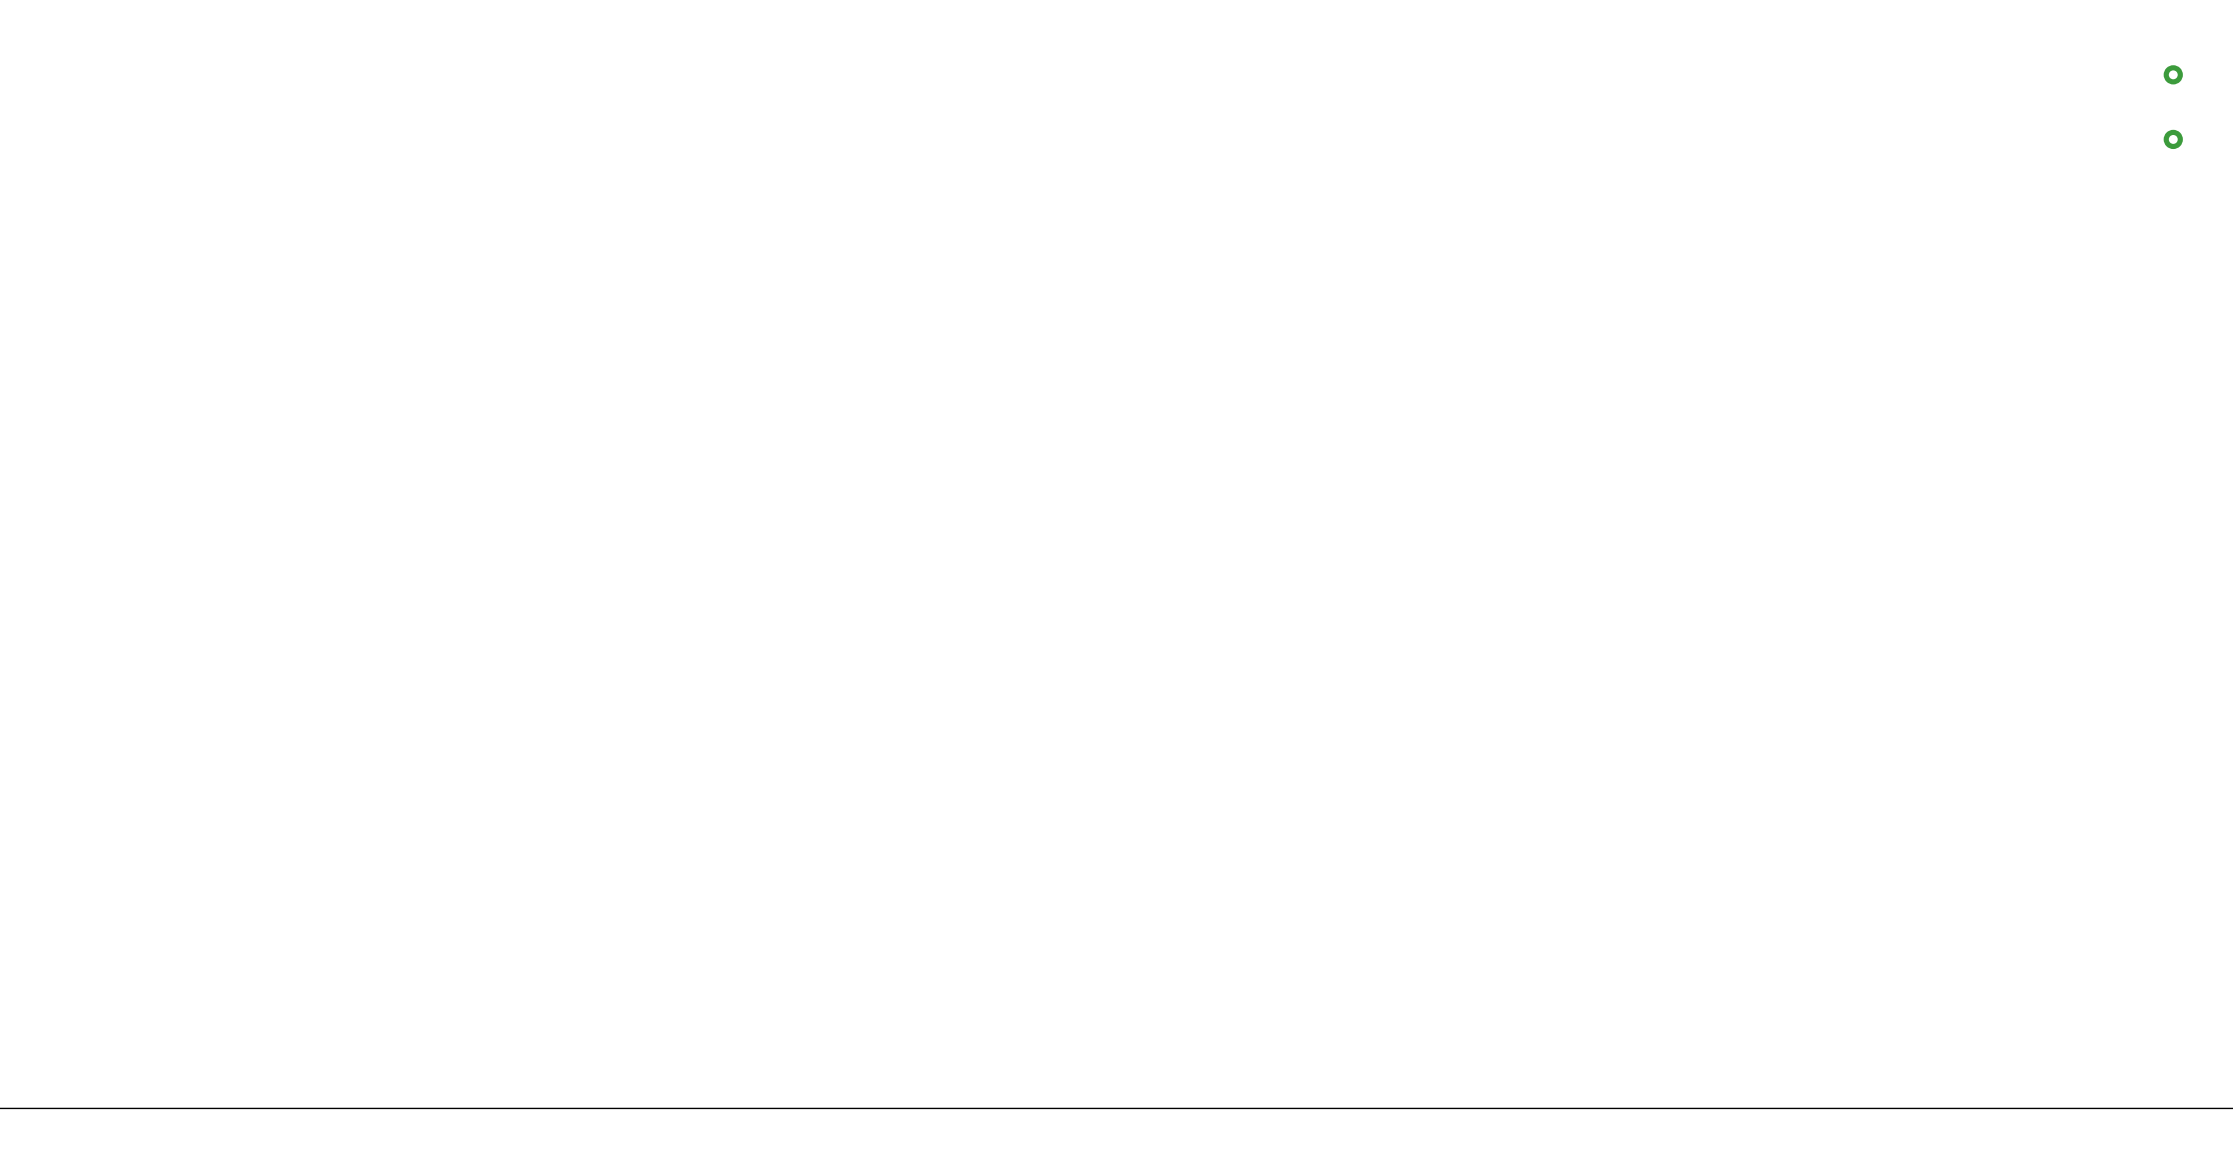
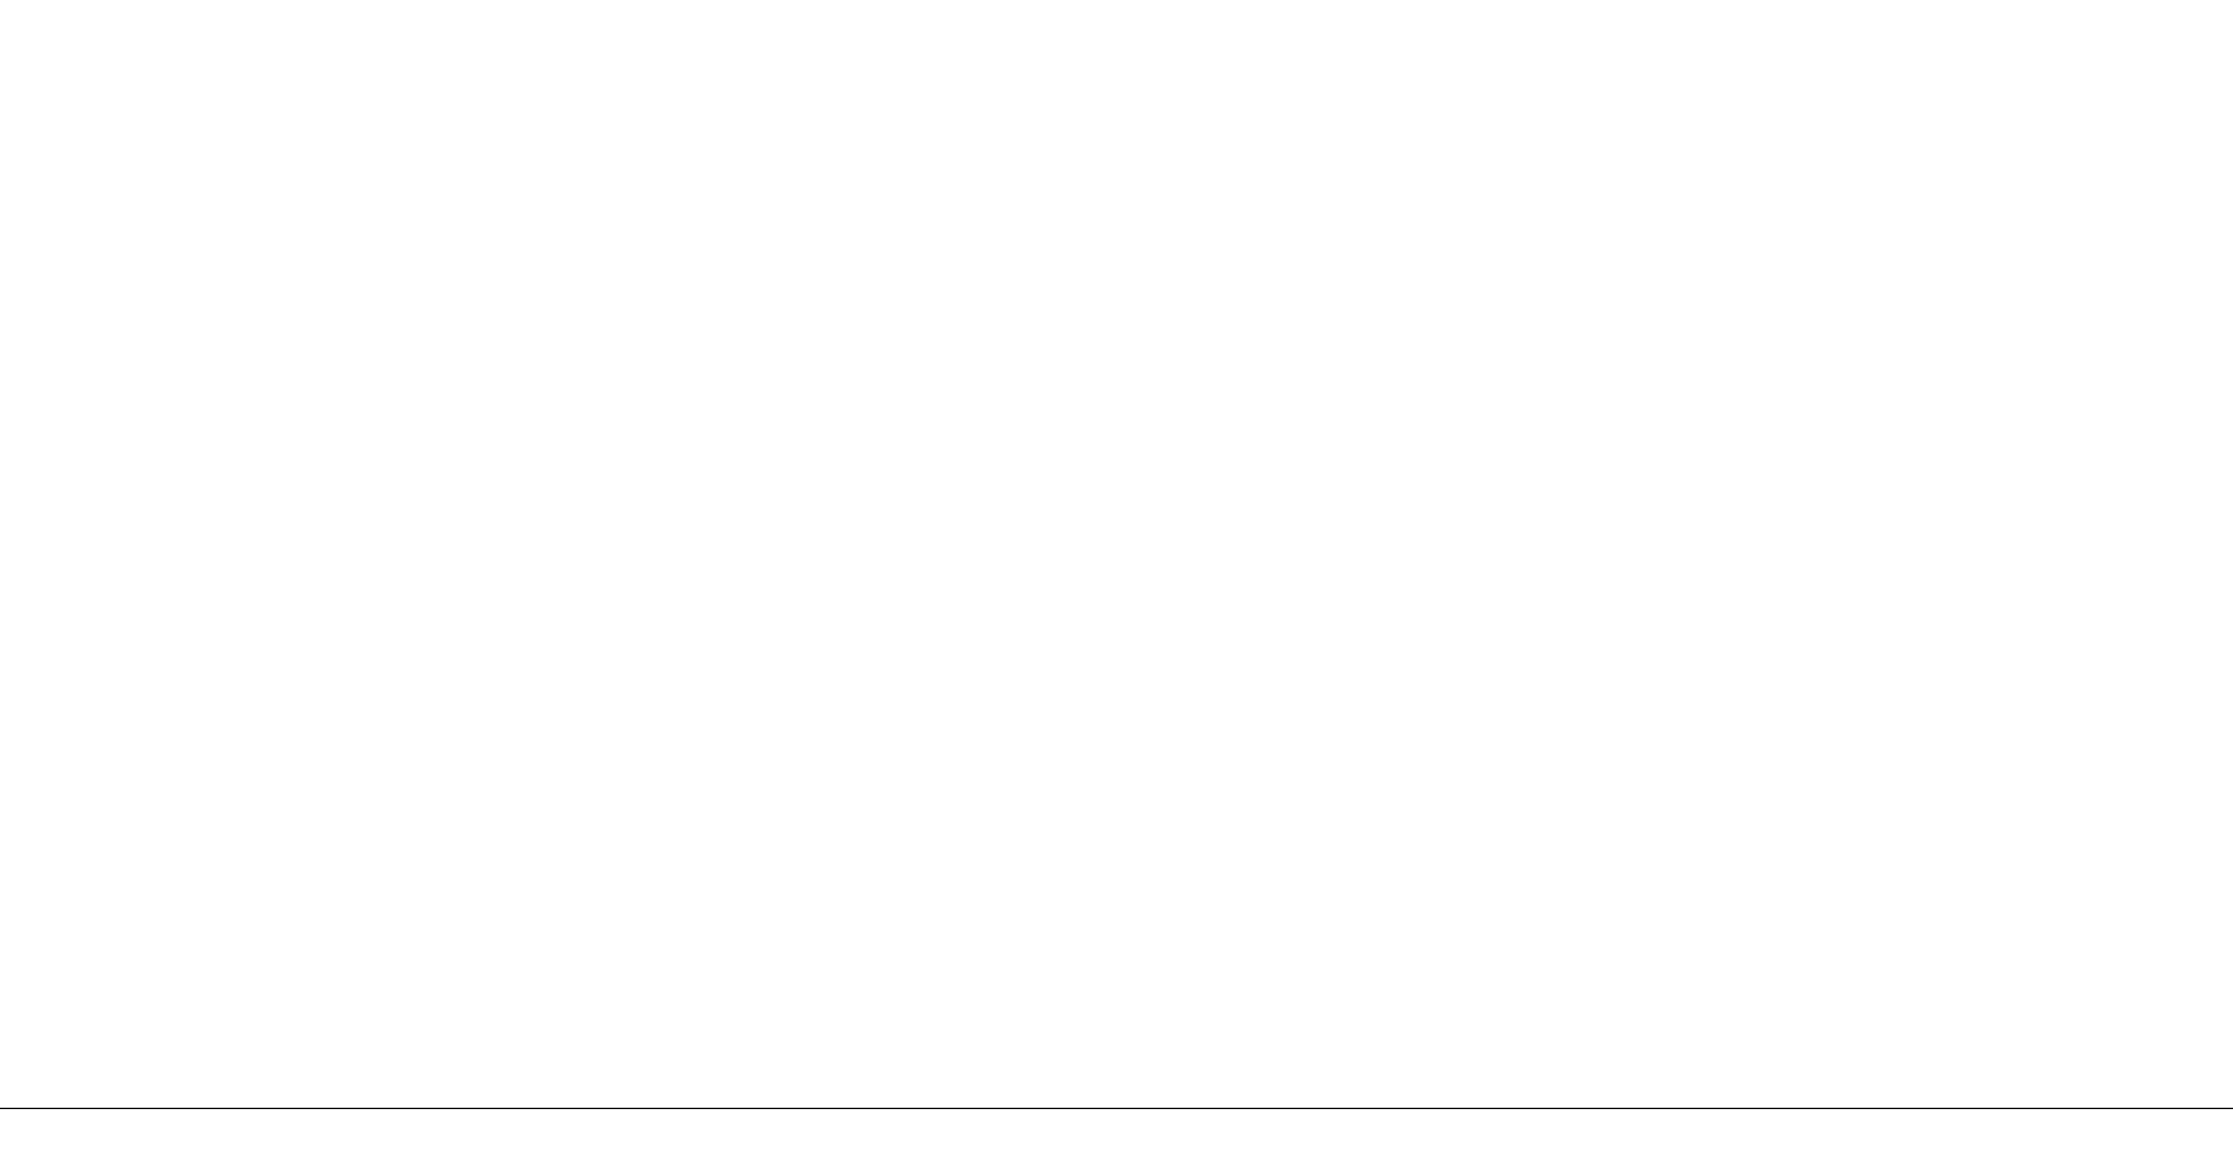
via: (2173, 74) -> none
via: (2173, 139) -> none

